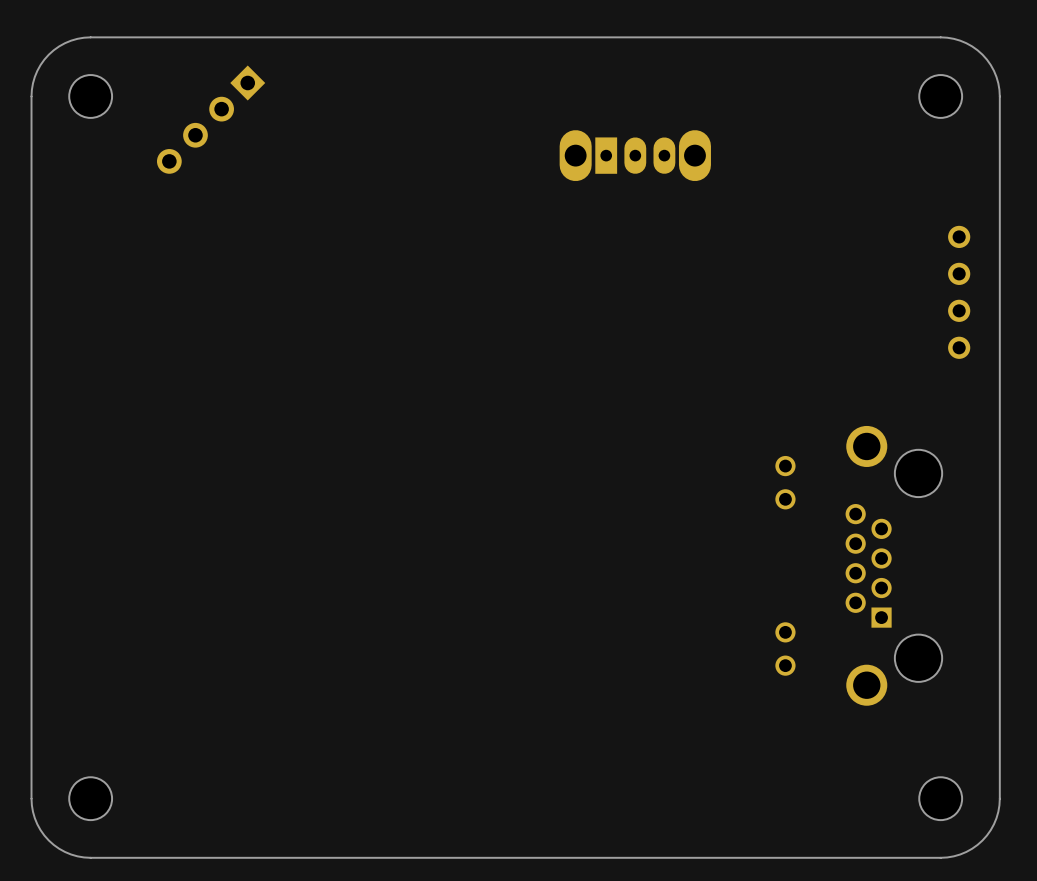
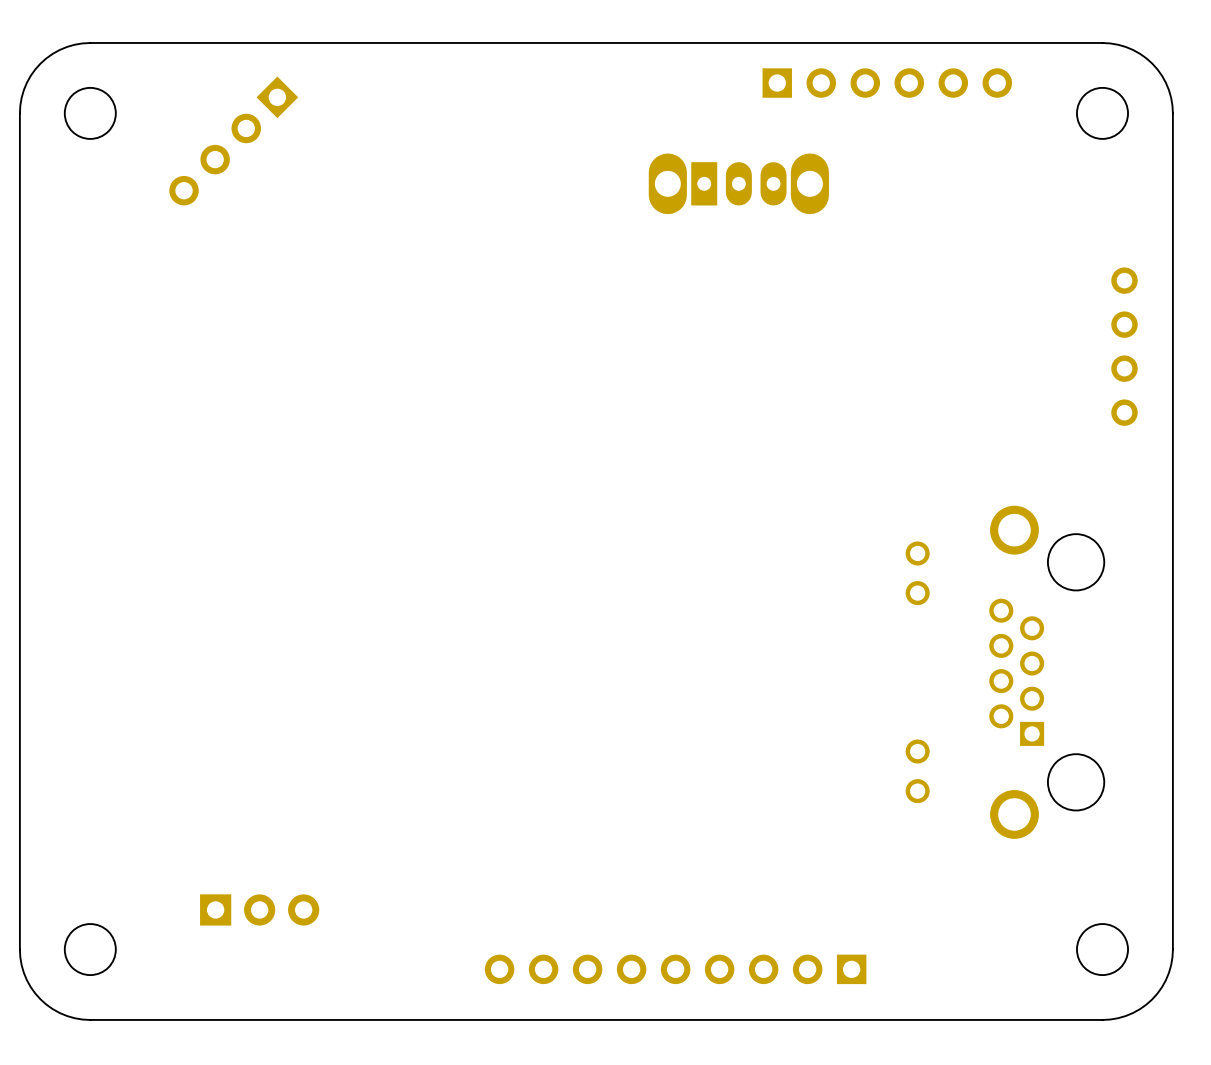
part: none -> (887, 83)
part: none -> (259, 909)
part: none -> (675, 969)

